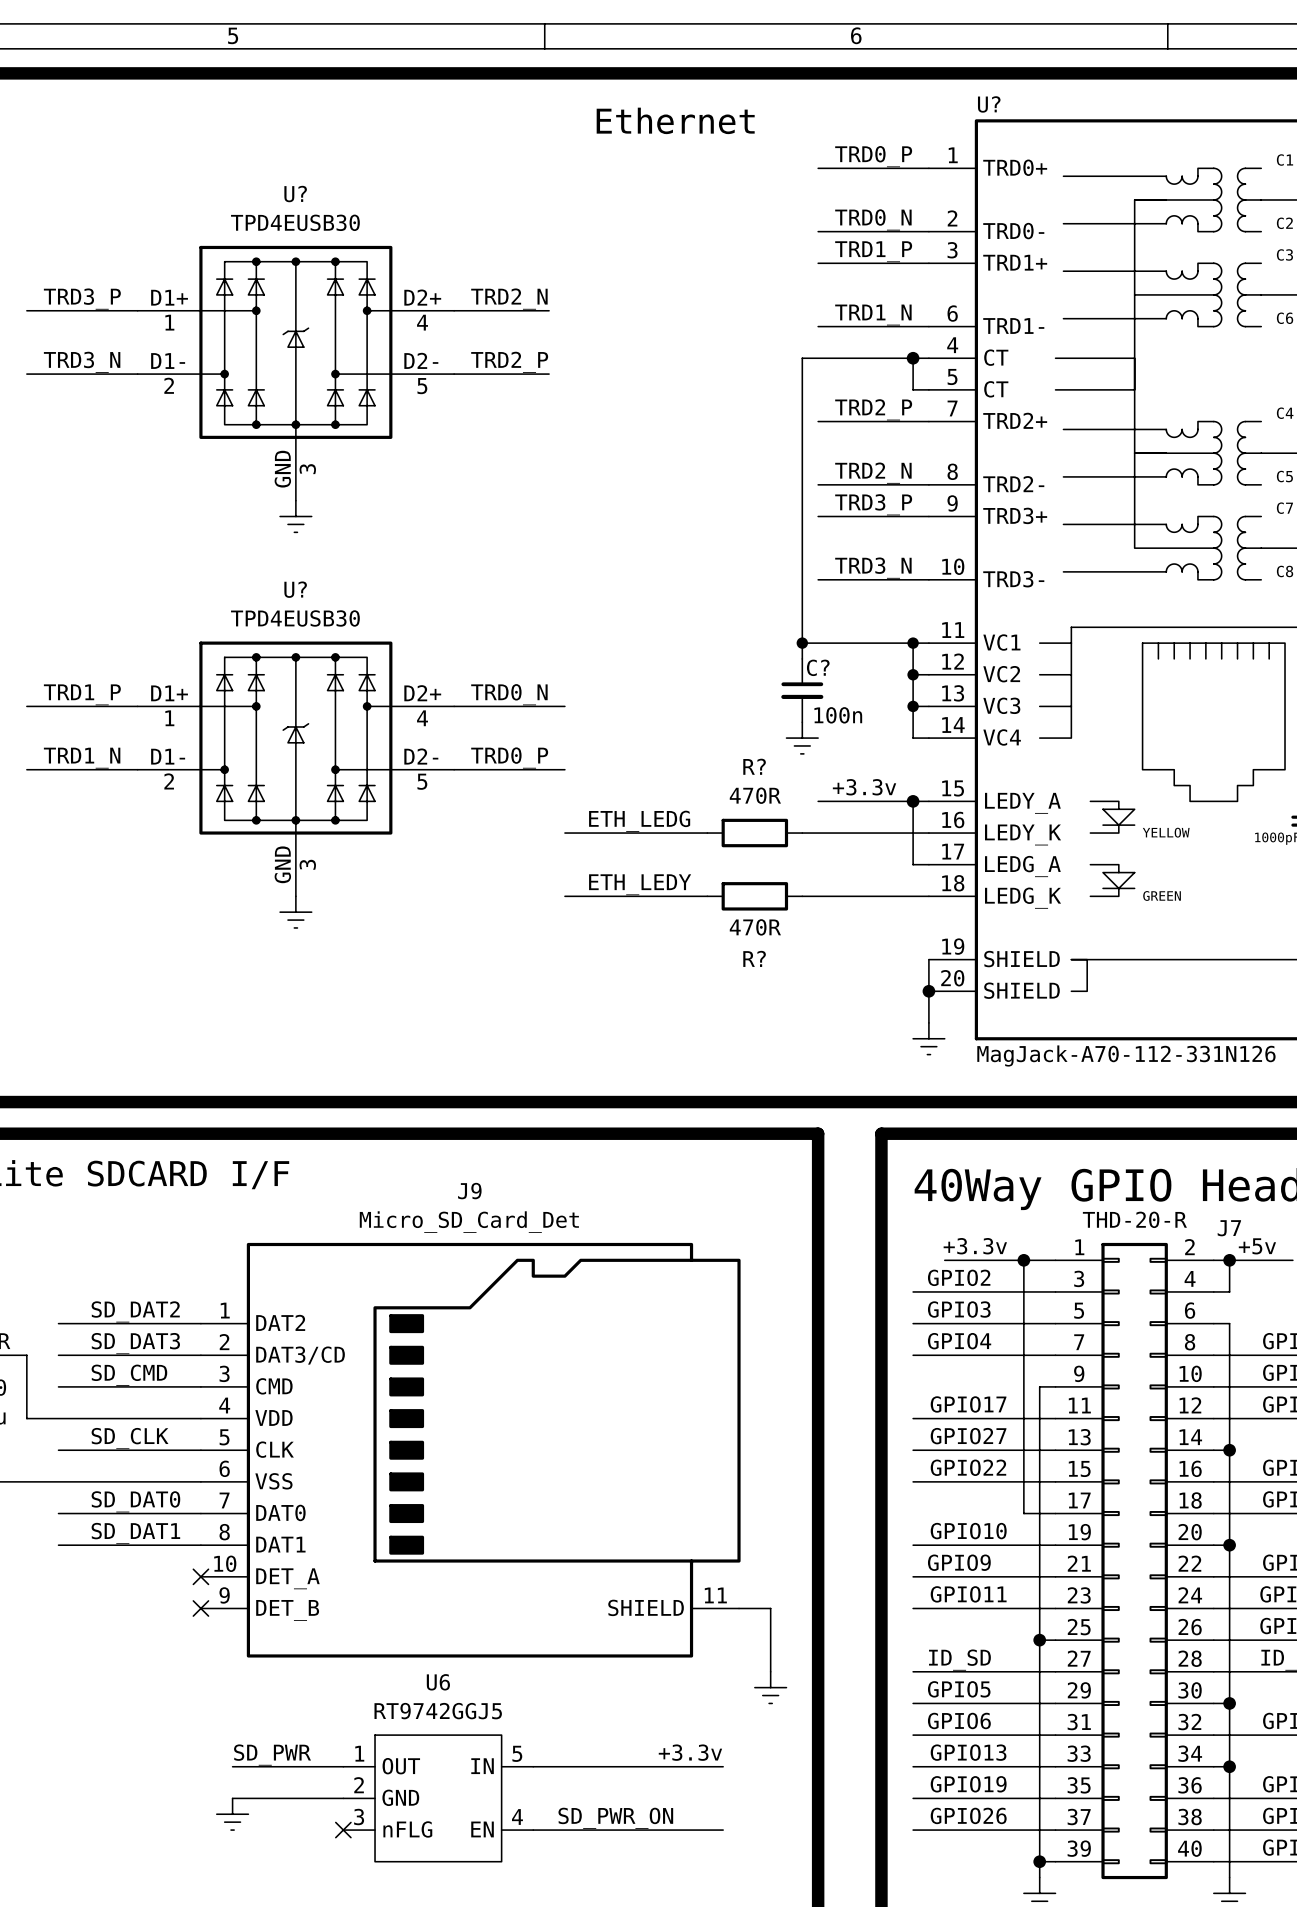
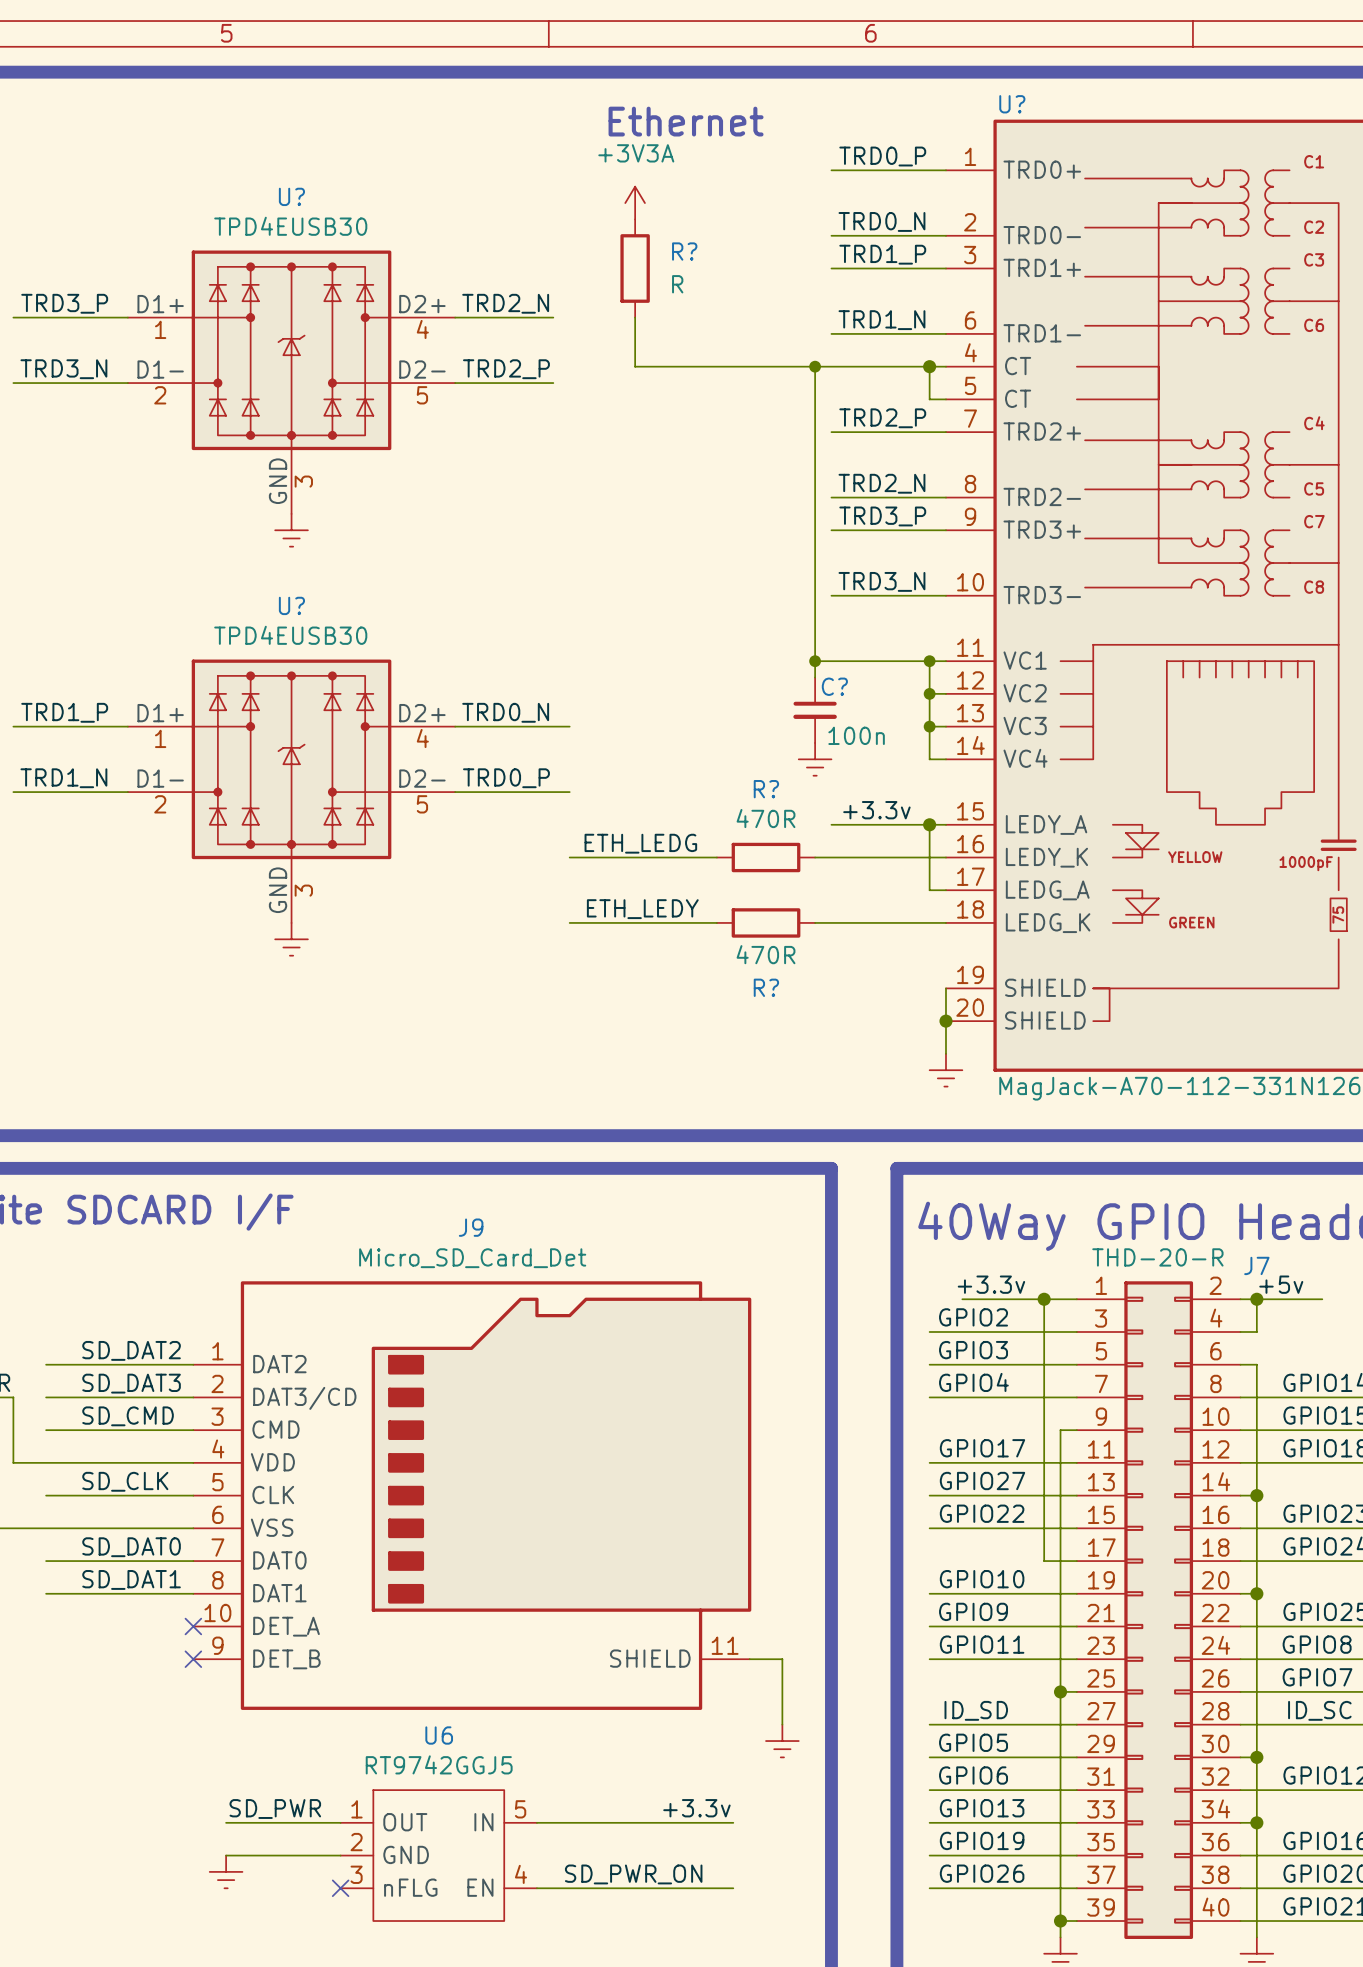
power symbol: none -> +3V3A (635, 203)
R?: none -> R (635, 268)
wire: none -> (635, 317) (635, 366) (815, 366)
junction: none -> (815, 366)

